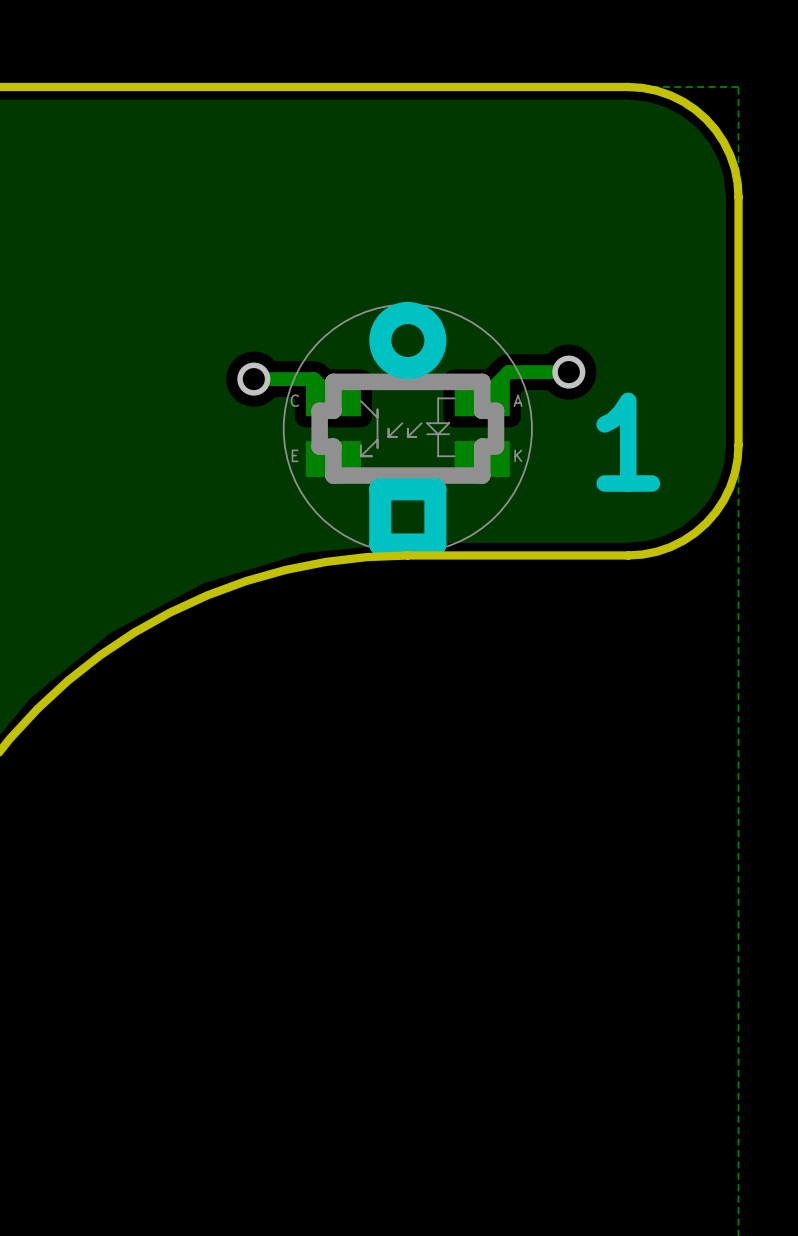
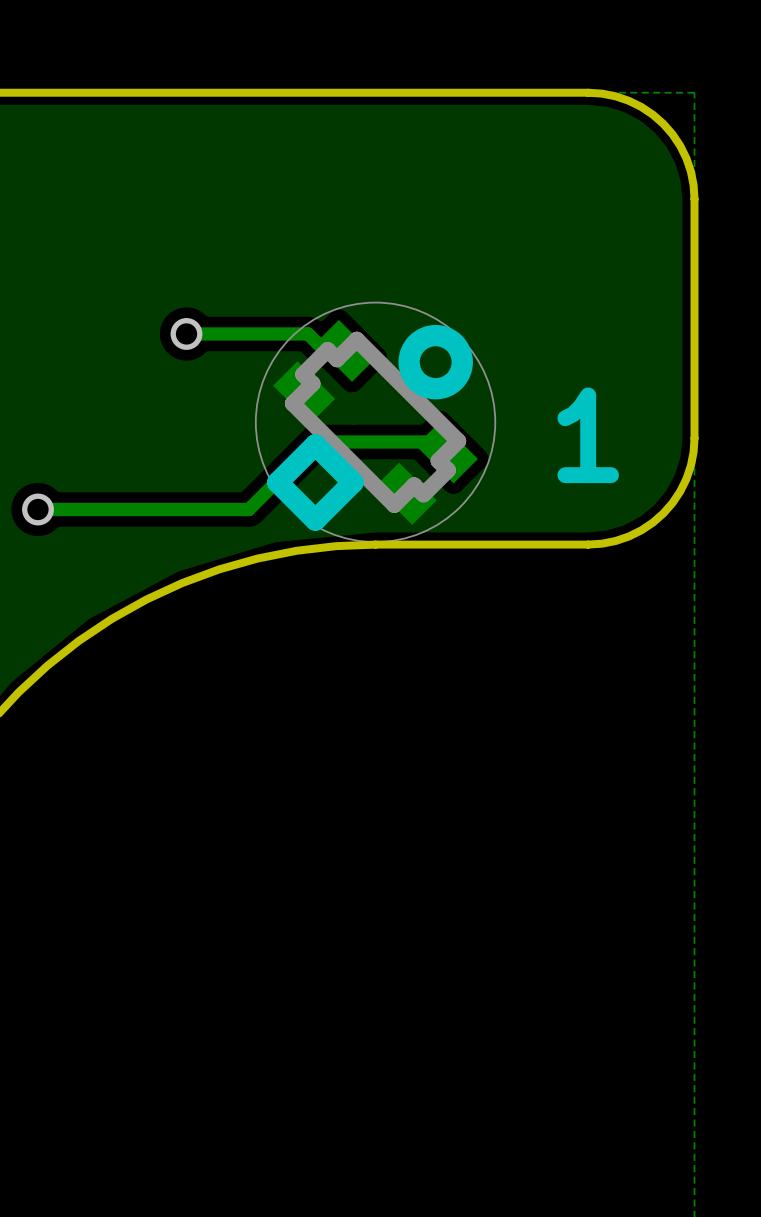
part footprint: [283, 301, 533, 556] -> [255, 302, 496, 543]
track: none -> (186, 333) (308, 333) (324, 350) (345, 350)
track: (568, 372) (508, 372) (482, 398) -> none
via: (568, 372) -> none
track: (253, 379) (314, 379) (333, 398) -> none
via position: (253, 379) -> (186, 333)
track: none -> (446, 452) (436, 441) (316, 441) (248, 509) (37, 509)
via: none -> (37, 509)

